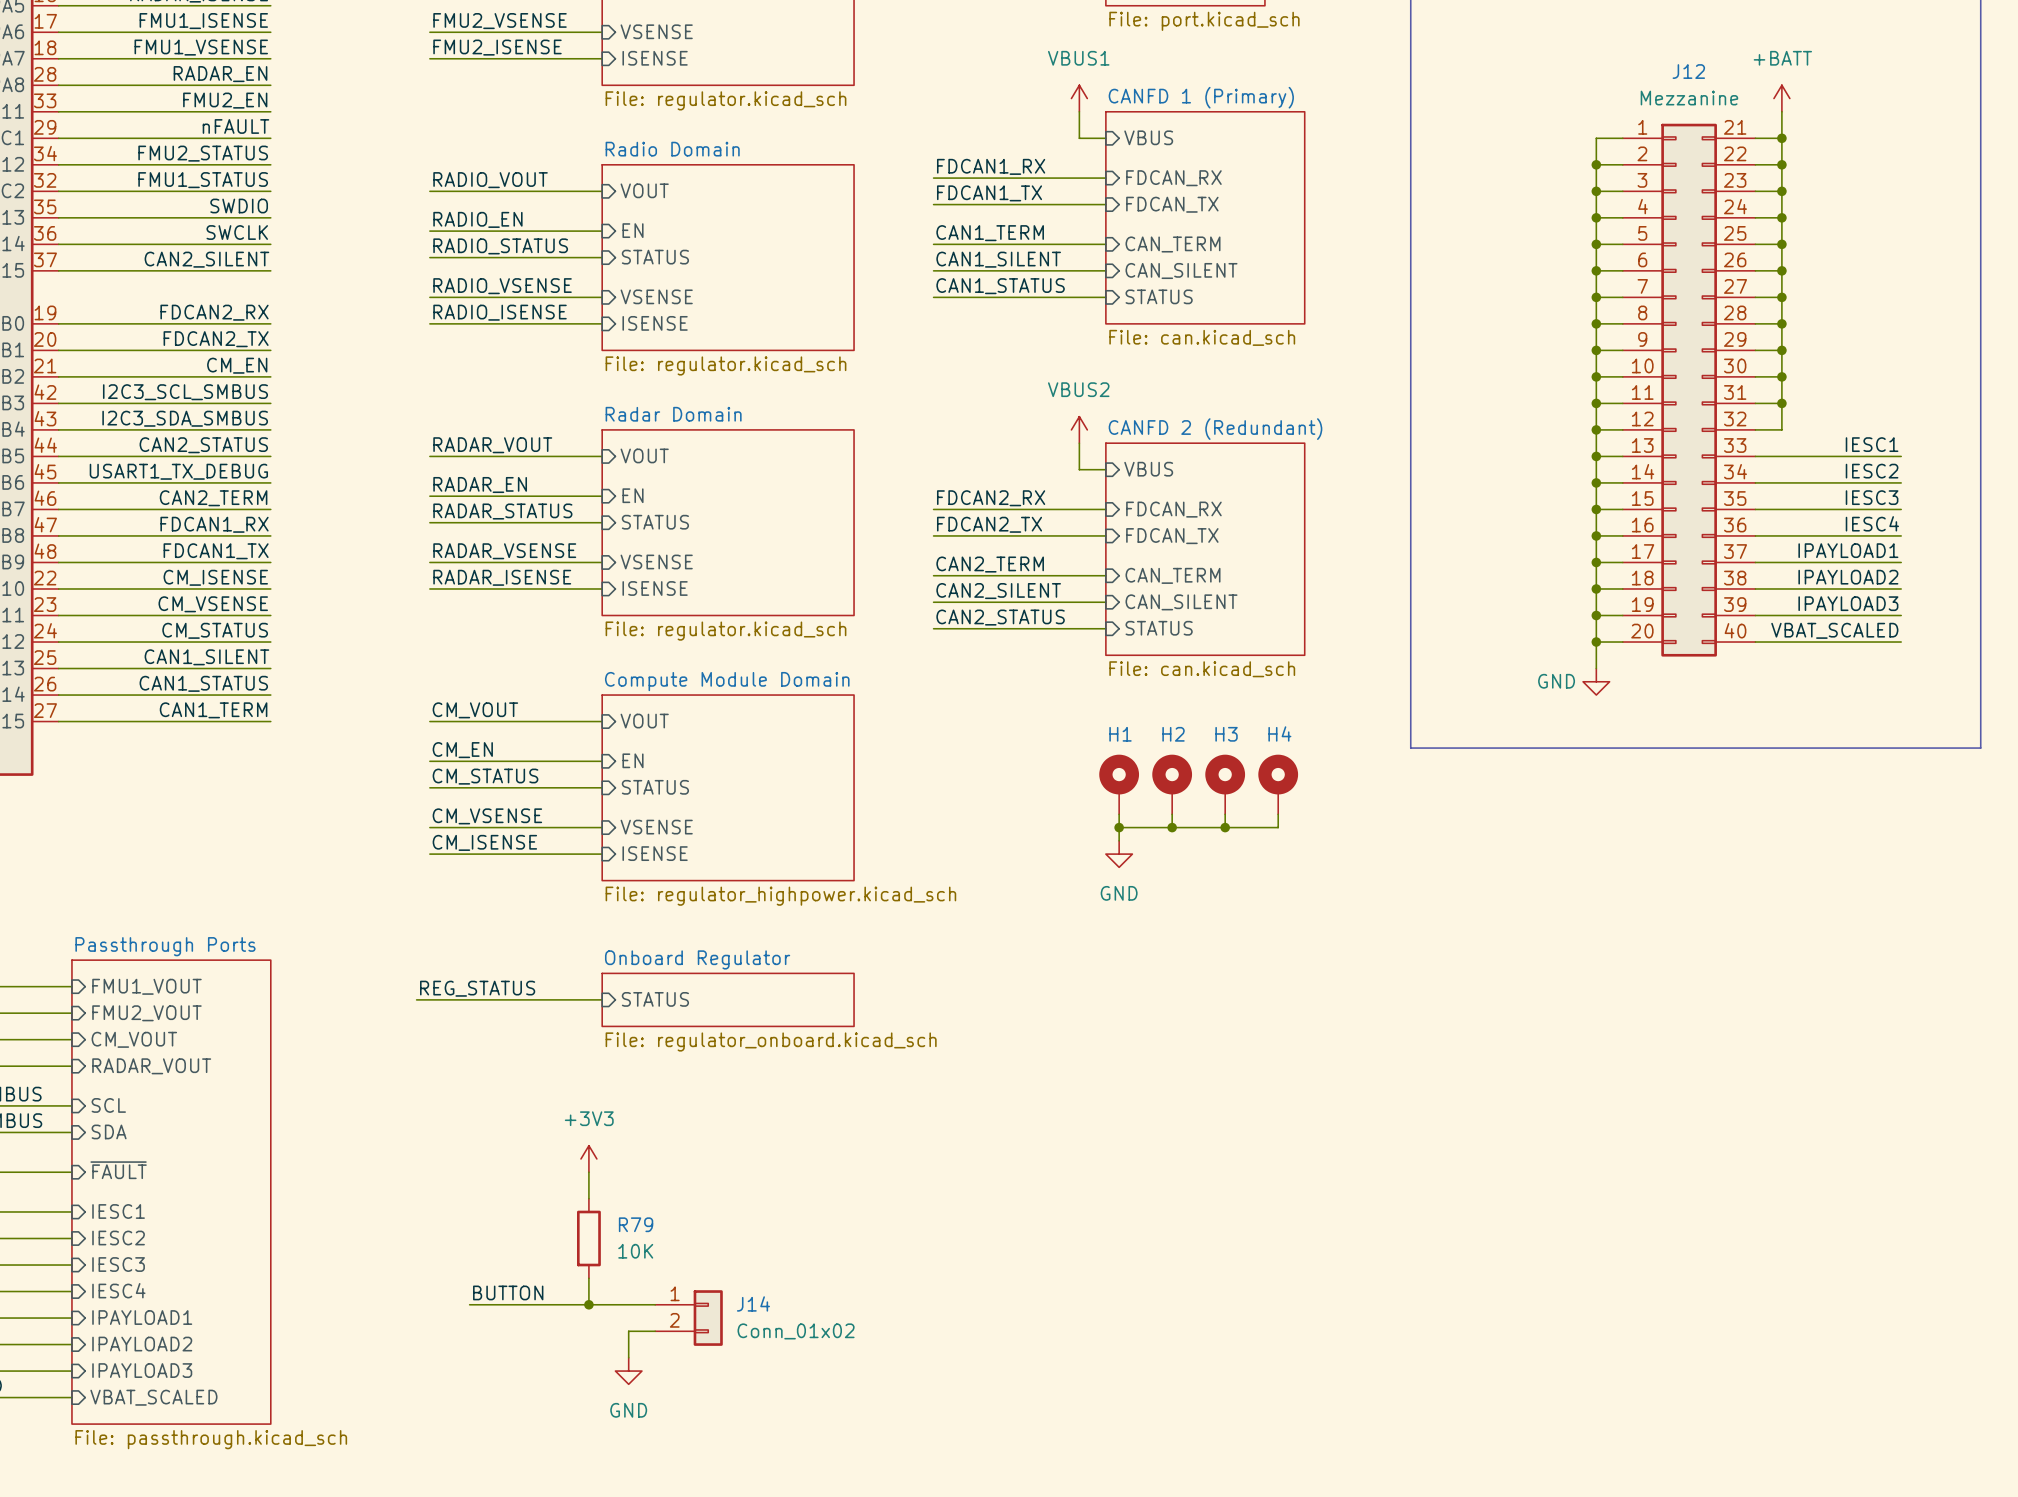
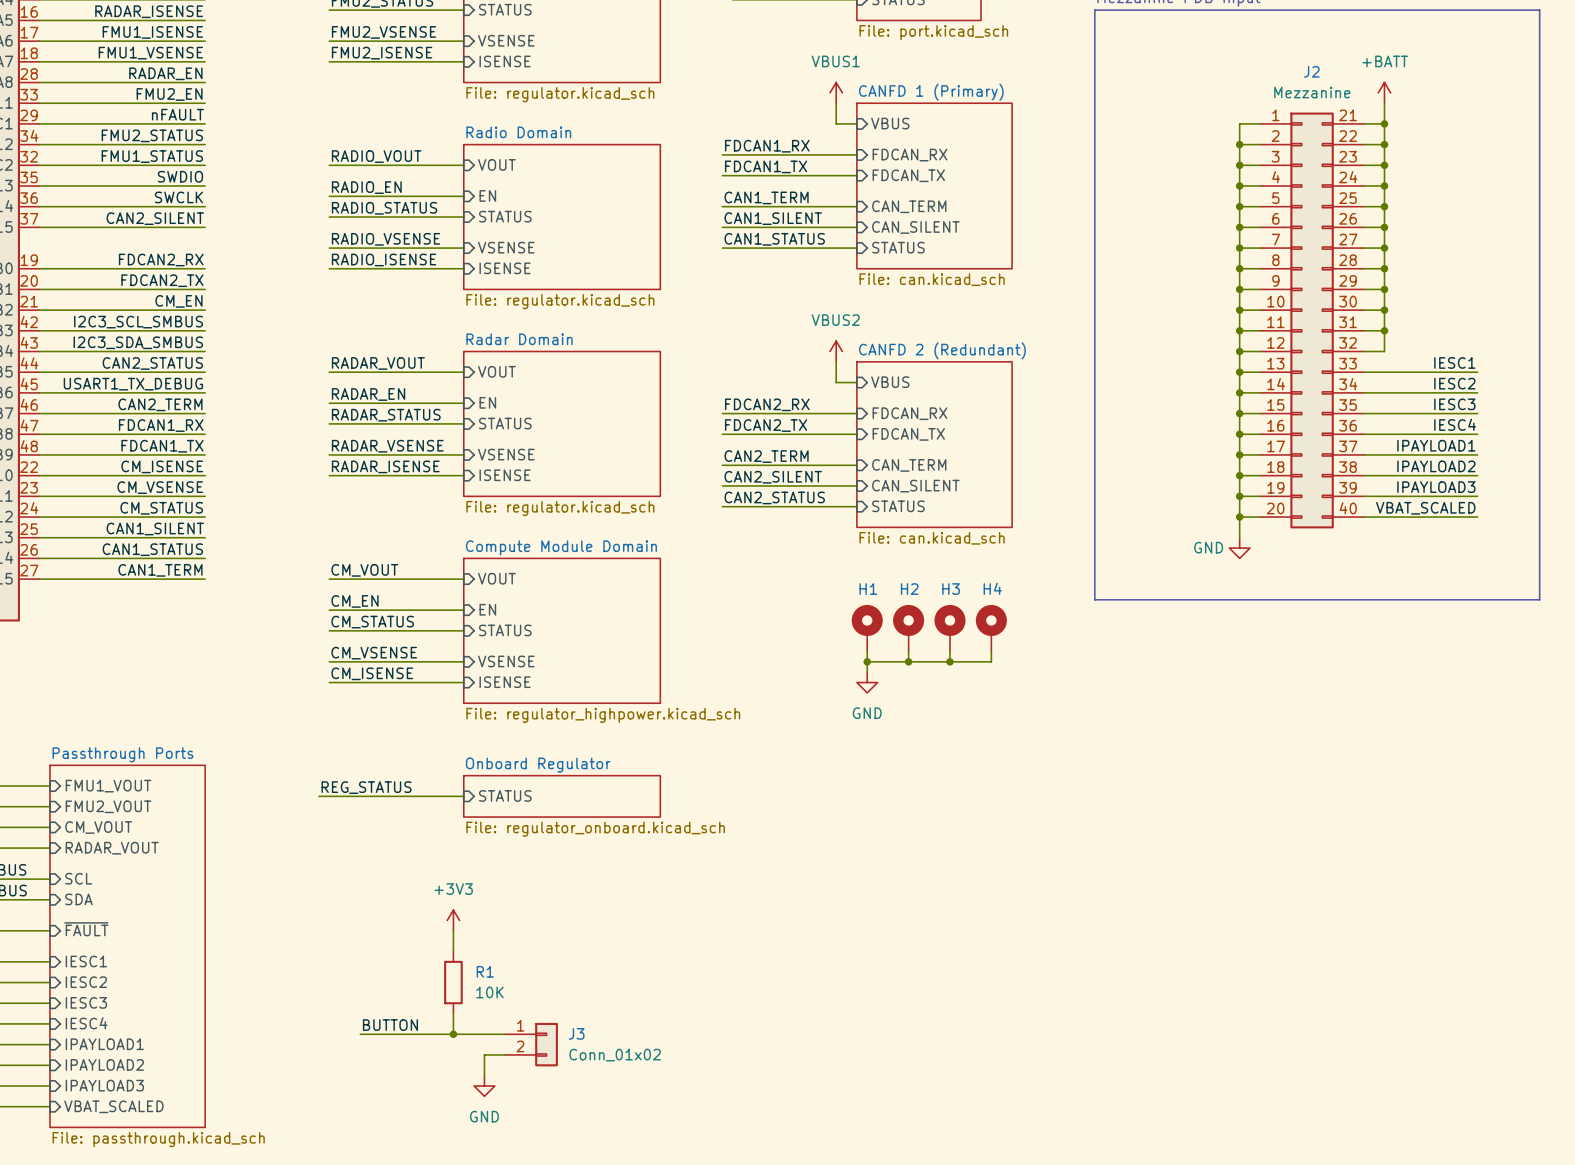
J12 name: J12 (1688, 71) -> J2 (1311, 71)
R79 name: R79 (636, 1224) -> R1 (485, 971)
J14 name: J14 (753, 1303) -> J3 (576, 1033)

